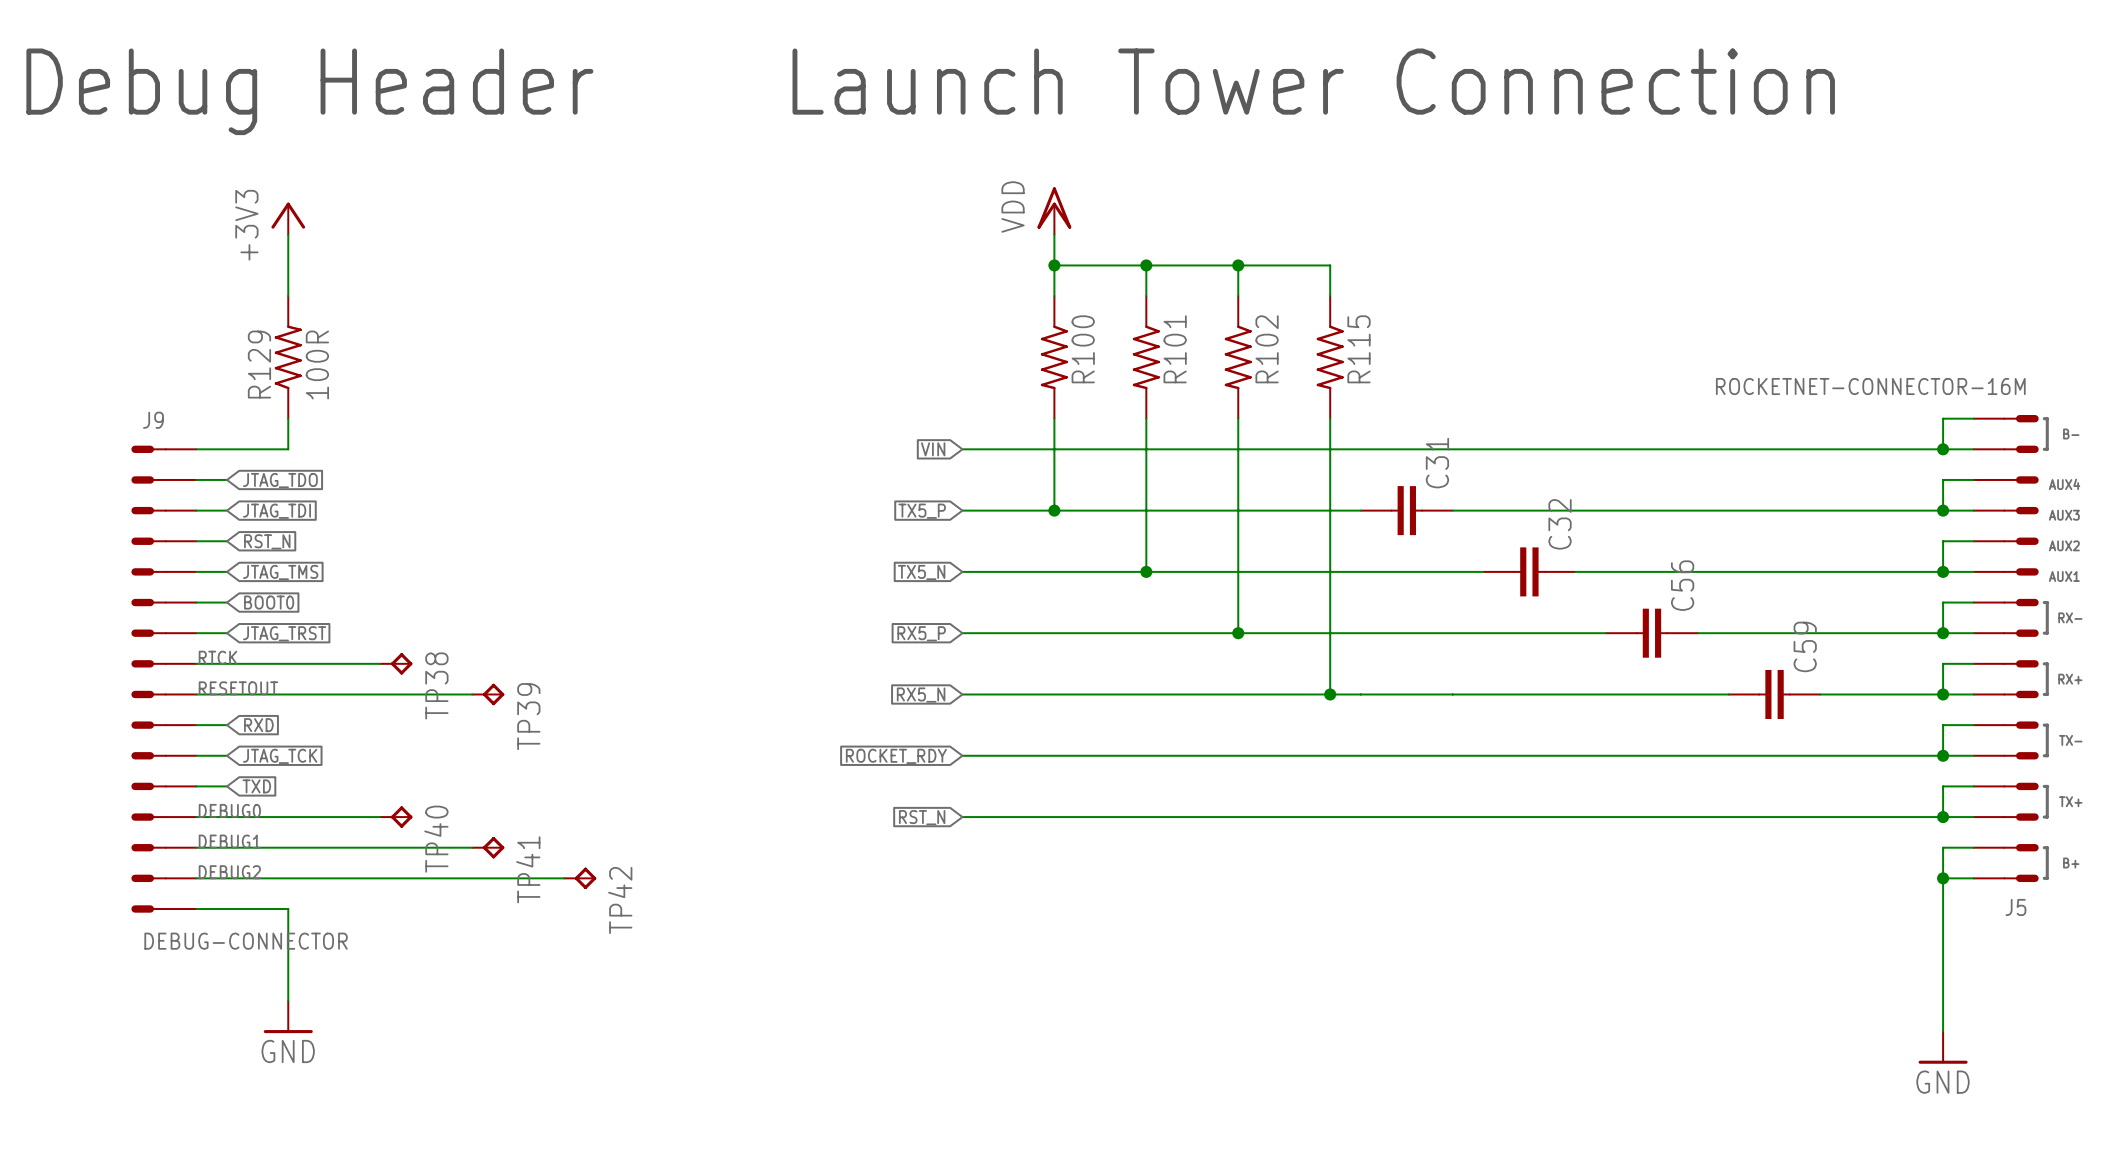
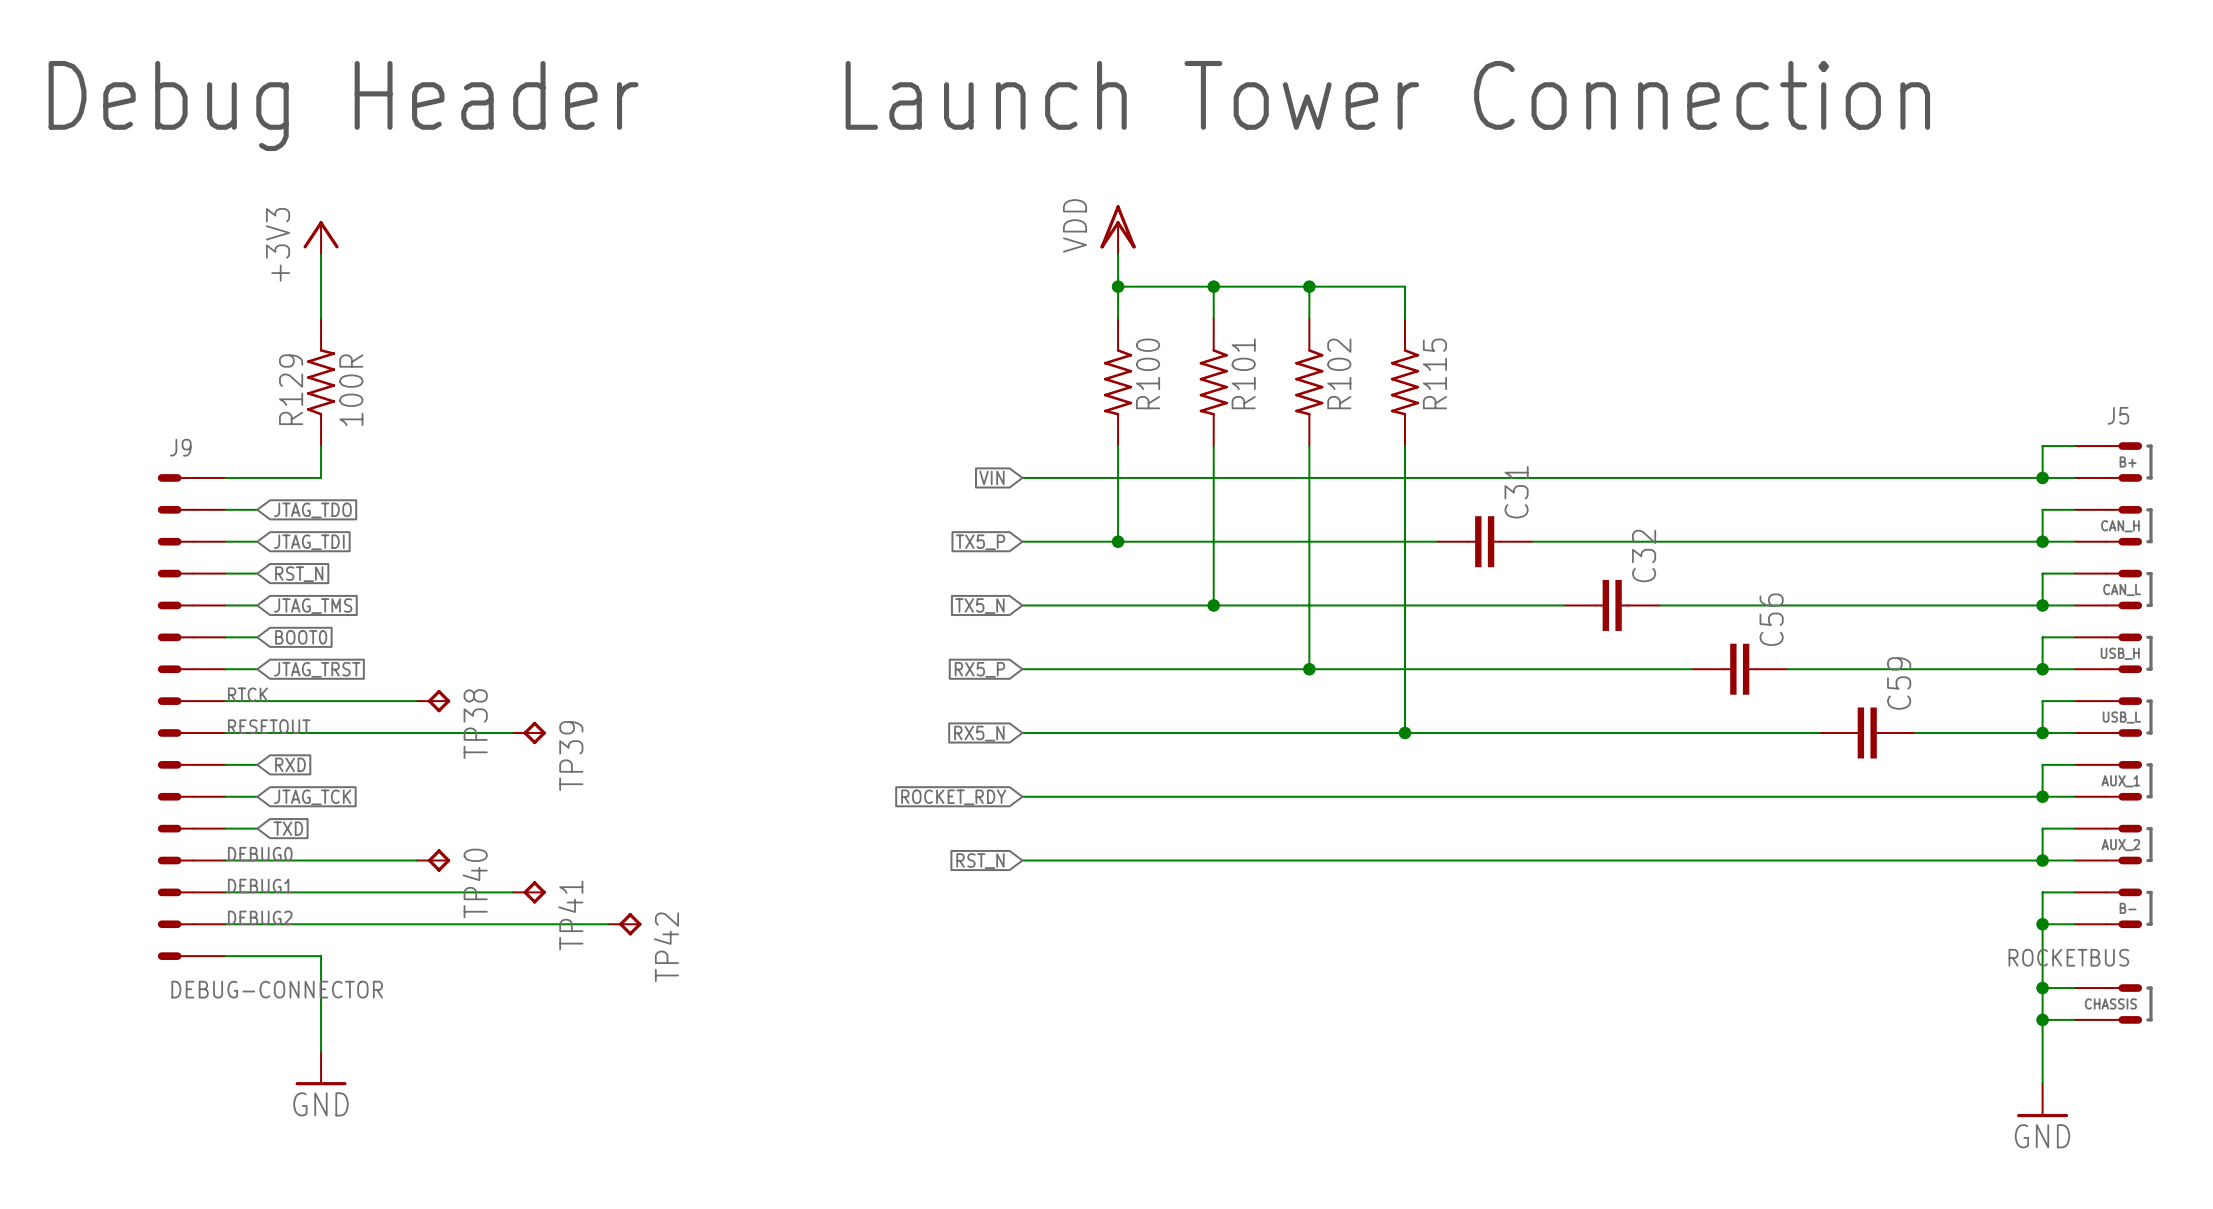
J5 value: ROCKETNET-CONNECTOR-16M (1870, 386) -> ROCKETBUS (2068, 957)
J5 symbol: [1973, 415, 2049, 883] -> [2074, 442, 2153, 1024]
J5 name position: J5 (2015, 907) -> J5 (2118, 415)
wire: none -> (2042, 988) (2074, 988)
junction: none -> (2042, 988)
wire: none -> (2042, 1019) (2074, 1019)
junction: none -> (2042, 1019)

